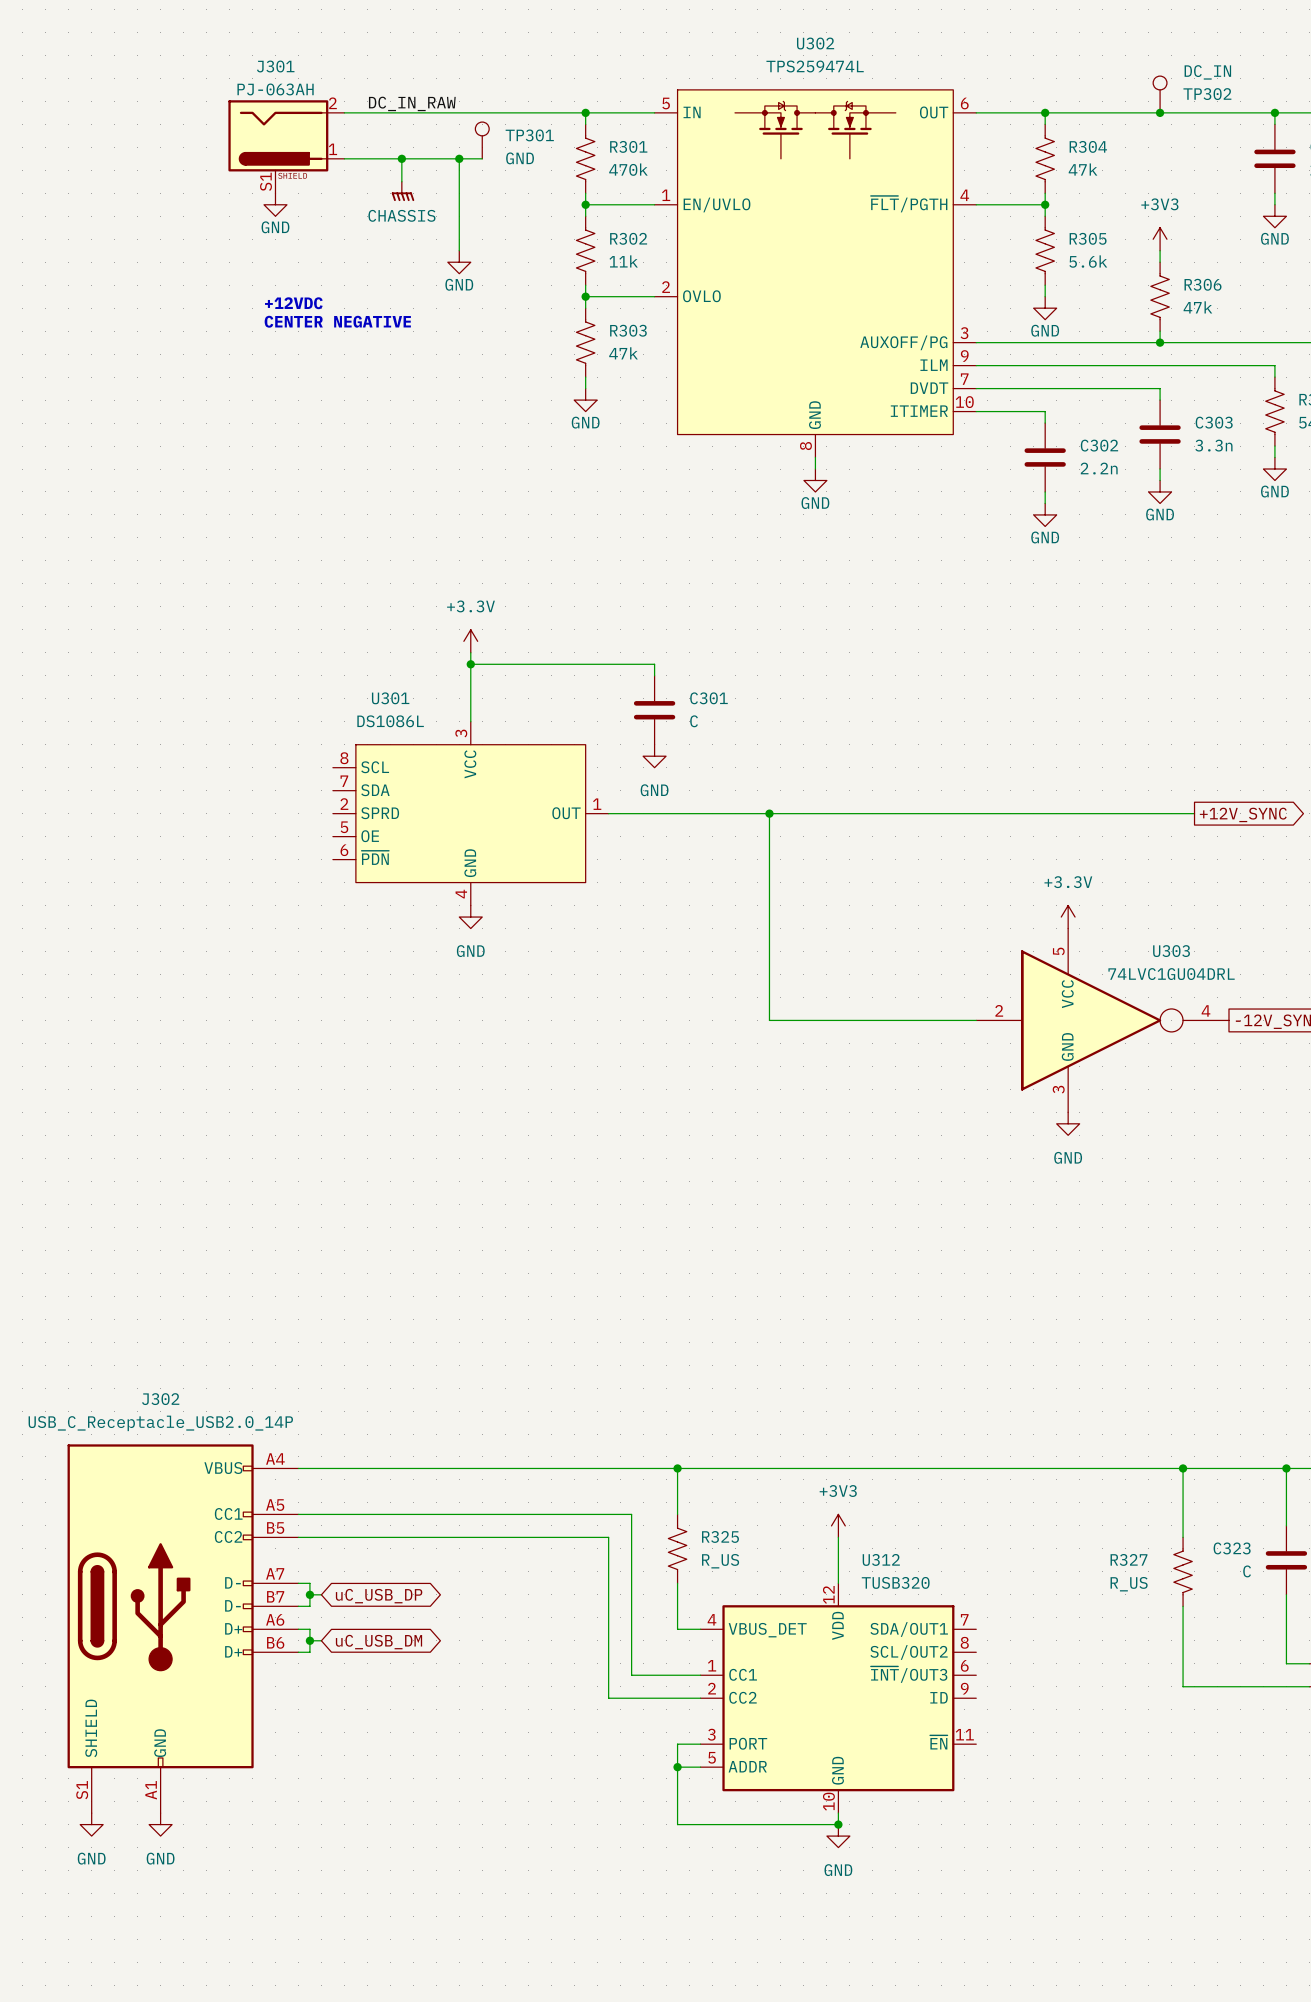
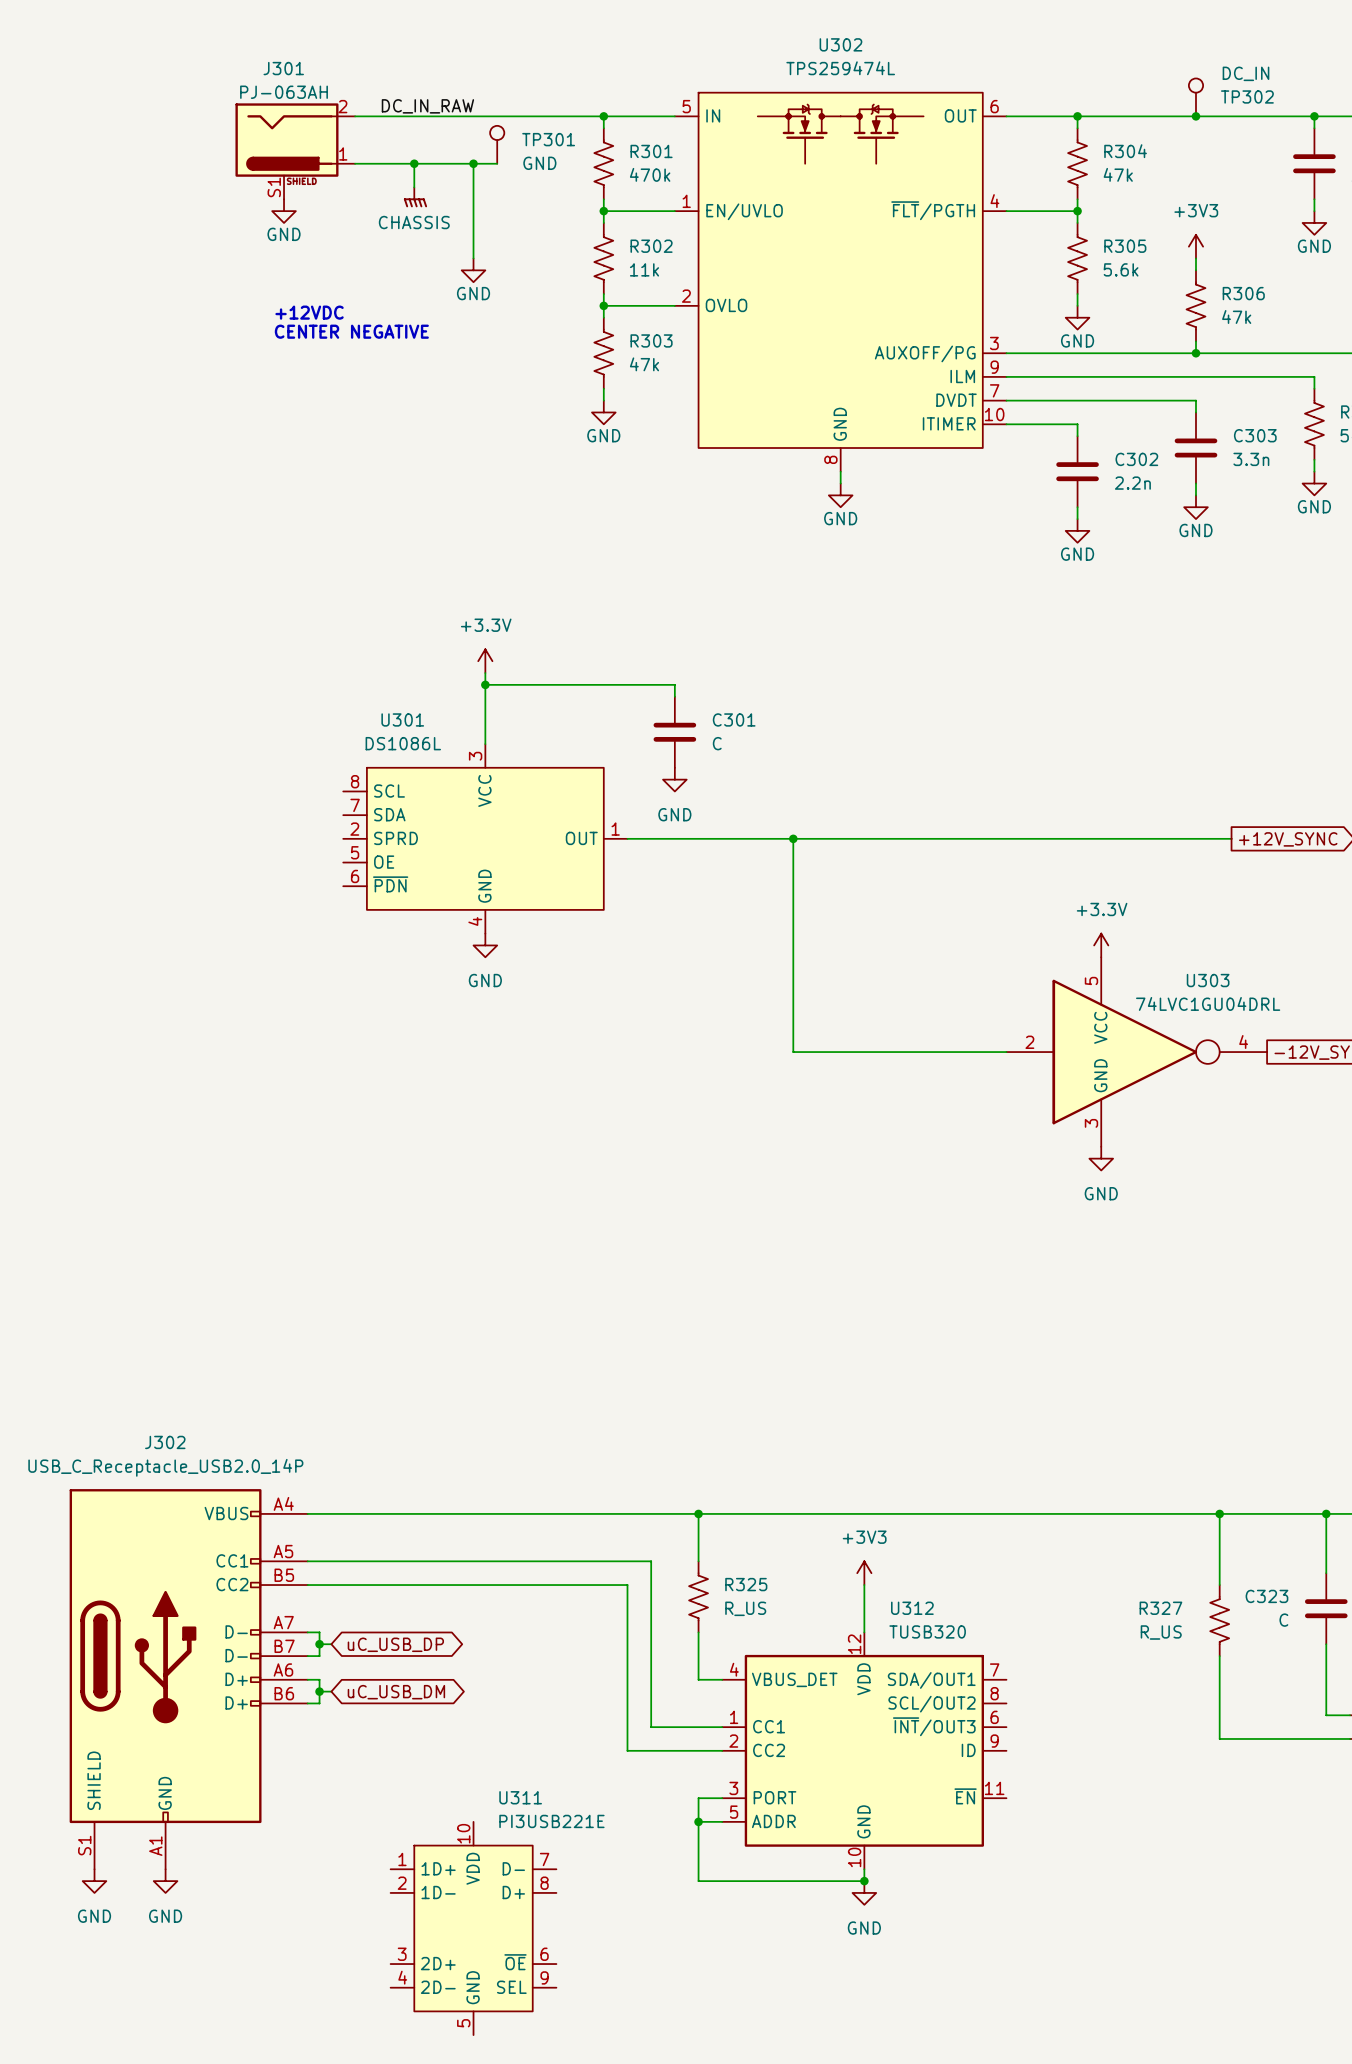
U311: none -> PI3USB221E (473, 1928)

